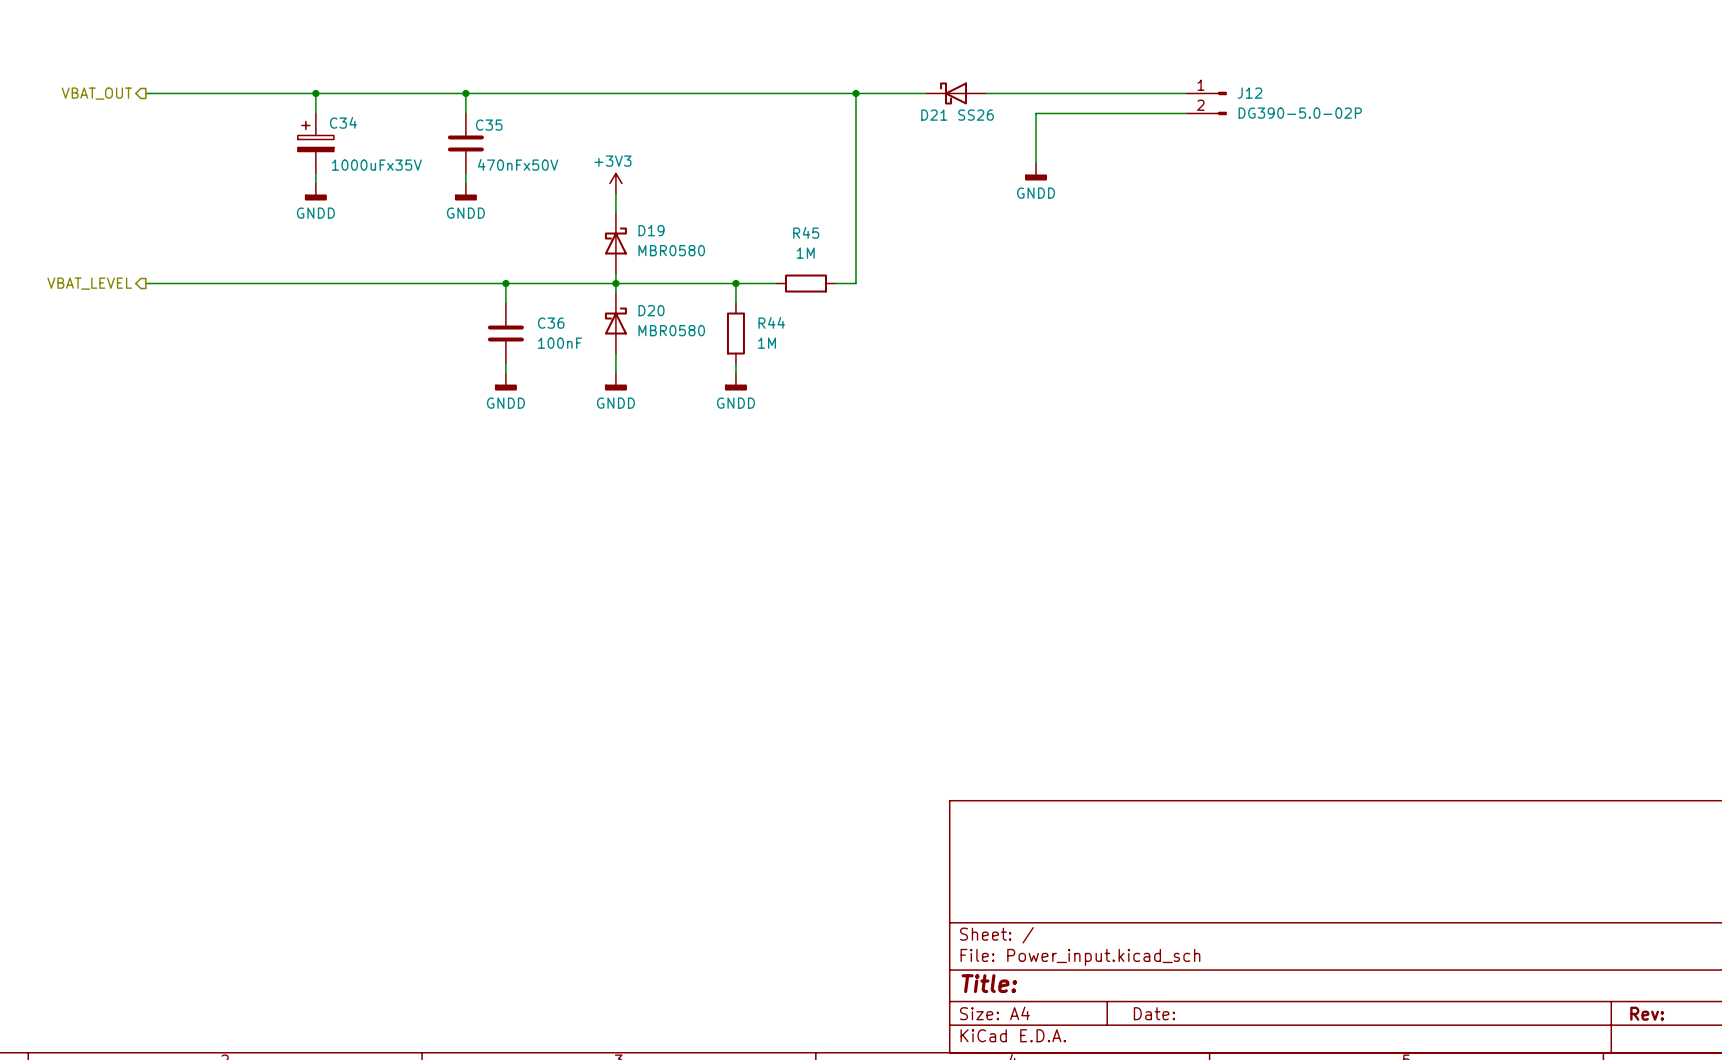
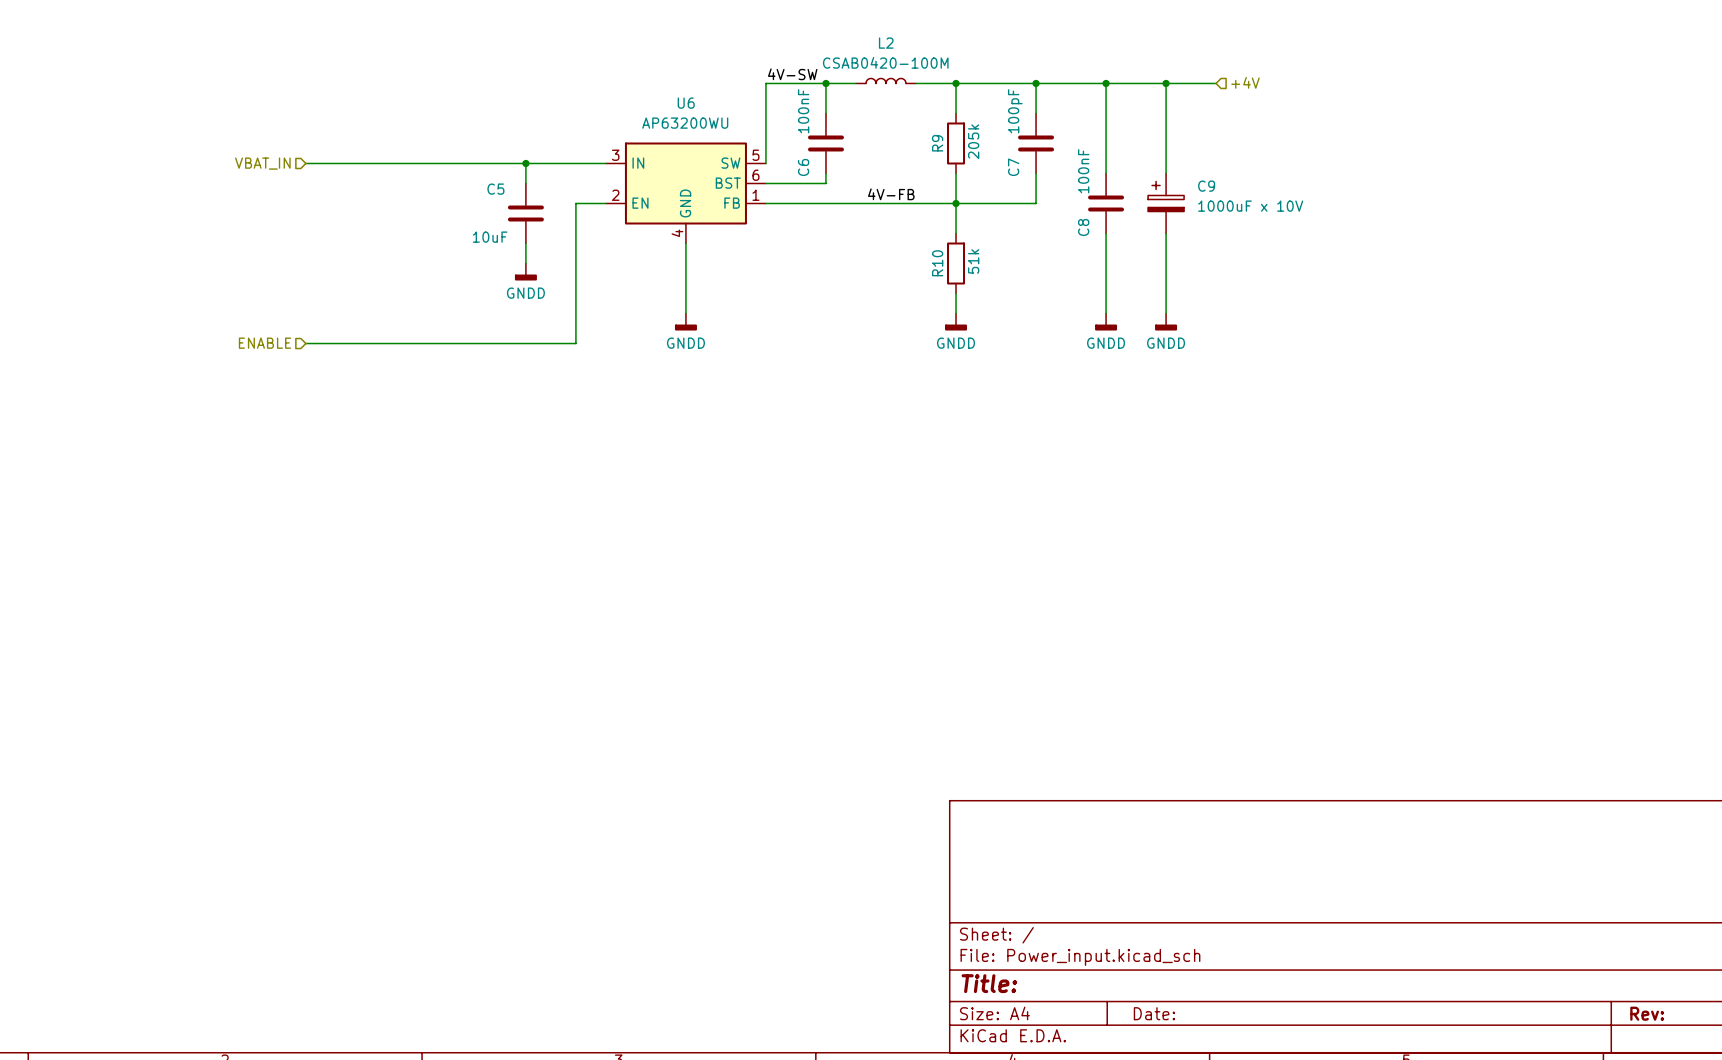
label: none -> 4V-SW (792, 74)
L2: none -> CSAB0420-100M (886, 80)
hierarchical label: none -> +4V (1245, 82)
wire: none -> (825, 83) (825, 113)
wire: none -> (855, 83) (765, 83) (765, 163)
wire: none -> (916, 83) (1216, 83)
wire: none -> (956, 83) (956, 113)
junction: none -> (956, 83)
wire: none -> (1036, 83) (1036, 113)
junction: none -> (1036, 83)
wire: none -> (1106, 83) (1106, 173)
junction: none -> (1106, 83)
wire: none -> (1166, 83) (1166, 173)
junction: none -> (1166, 83)
hierarchical label: VBAT_OUT (96, 93) -> none
wire: (145, 93) (926, 93) -> none
wire: (315, 93) (315, 113) -> none
junction: (315, 93) -> none
wire: (465, 93) (465, 113) -> none
junction: (465, 93) -> none
wire: (855, 93) (855, 283) (835, 283) -> none
junction position: (855, 93) -> (825, 83)
D21: SS26 (956, 93) -> none
wire: (986, 93) (1186, 93) -> none
J12: DG390-5.0-02P (1206, 103) -> none
wire: (1186, 113) (1036, 113) (1036, 163) -> none
C34: 1000uFx35V (315, 143) -> none
C35: 470nFx50V (465, 143) -> none
C6: none -> 100nF (825, 143)
R9: none -> 205k (956, 143)
C7: none -> 100pF (1036, 143)
hierarchical label: none -> VBAT_IN (262, 163)
wire: none -> (305, 163) (605, 163)
junction: none -> (525, 163)
power symbol: GNDD (1036, 171) -> none
wire: (315, 173) (315, 183) -> none
wire: (465, 173) (465, 183) -> none
wire: none -> (825, 173) (825, 183) (765, 183)
wire: none -> (956, 173) (956, 233)
wire: none -> (1036, 173) (1036, 203) (765, 203)
power symbol: +3V3 (615, 183) -> none
power symbol: GNDD (315, 191) -> none
power symbol: GNDD (465, 191) -> none
U6: none -> AP63200WU (685, 192)
wire: (615, 193) (615, 213) -> (525, 163) (525, 183)
label: none -> 4V-FB (891, 194)
wire: none -> (605, 203) (575, 203) (575, 343) (305, 343)
junction: none -> (956, 203)
C8: none -> 100nF (1106, 203)
C9: none -> 1000uF x 10V (1166, 203)
C5: none -> 10uF (525, 213)
wire: none -> (1106, 233) (1106, 313)
wire: none -> (1166, 233) (1166, 313)
D19: MBR0580 (615, 243) -> none
wire: none -> (685, 243) (685, 313)
R10: none -> 51k (956, 263)
power symbol: none -> GNDD (525, 272)
wire: (615, 273) (615, 293) -> (525, 243) (525, 263)
hierarchical label: VBAT_LEVEL (89, 283) -> none
wire: (145, 283) (775, 283) -> none
wire: (505, 283) (505, 303) -> none
junction: (505, 283) -> none
junction: (615, 283) -> none
wire: (735, 283) (735, 303) -> none
junction: (735, 283) -> none
R45: 1M (805, 283) -> none
wire: none -> (956, 293) (956, 313)
power symbol: none -> GNDD (685, 322)
power symbol: none -> GNDD (956, 322)
power symbol: none -> GNDD (1106, 322)
power symbol: none -> GNDD (1166, 322)
D20: MBR0580 (615, 323) -> none
C36: 100nF (505, 333) -> none
R44: 1M (735, 333) -> none
hierarchical label: none -> ENABLE (264, 343)
wire: (615, 353) (615, 373) -> none
wire: (505, 363) (505, 373) -> none
wire: (735, 363) (735, 373) -> none
power symbol: GNDD (505, 382) -> none
power symbol: GNDD (615, 382) -> none
power symbol: GNDD (735, 382) -> none

